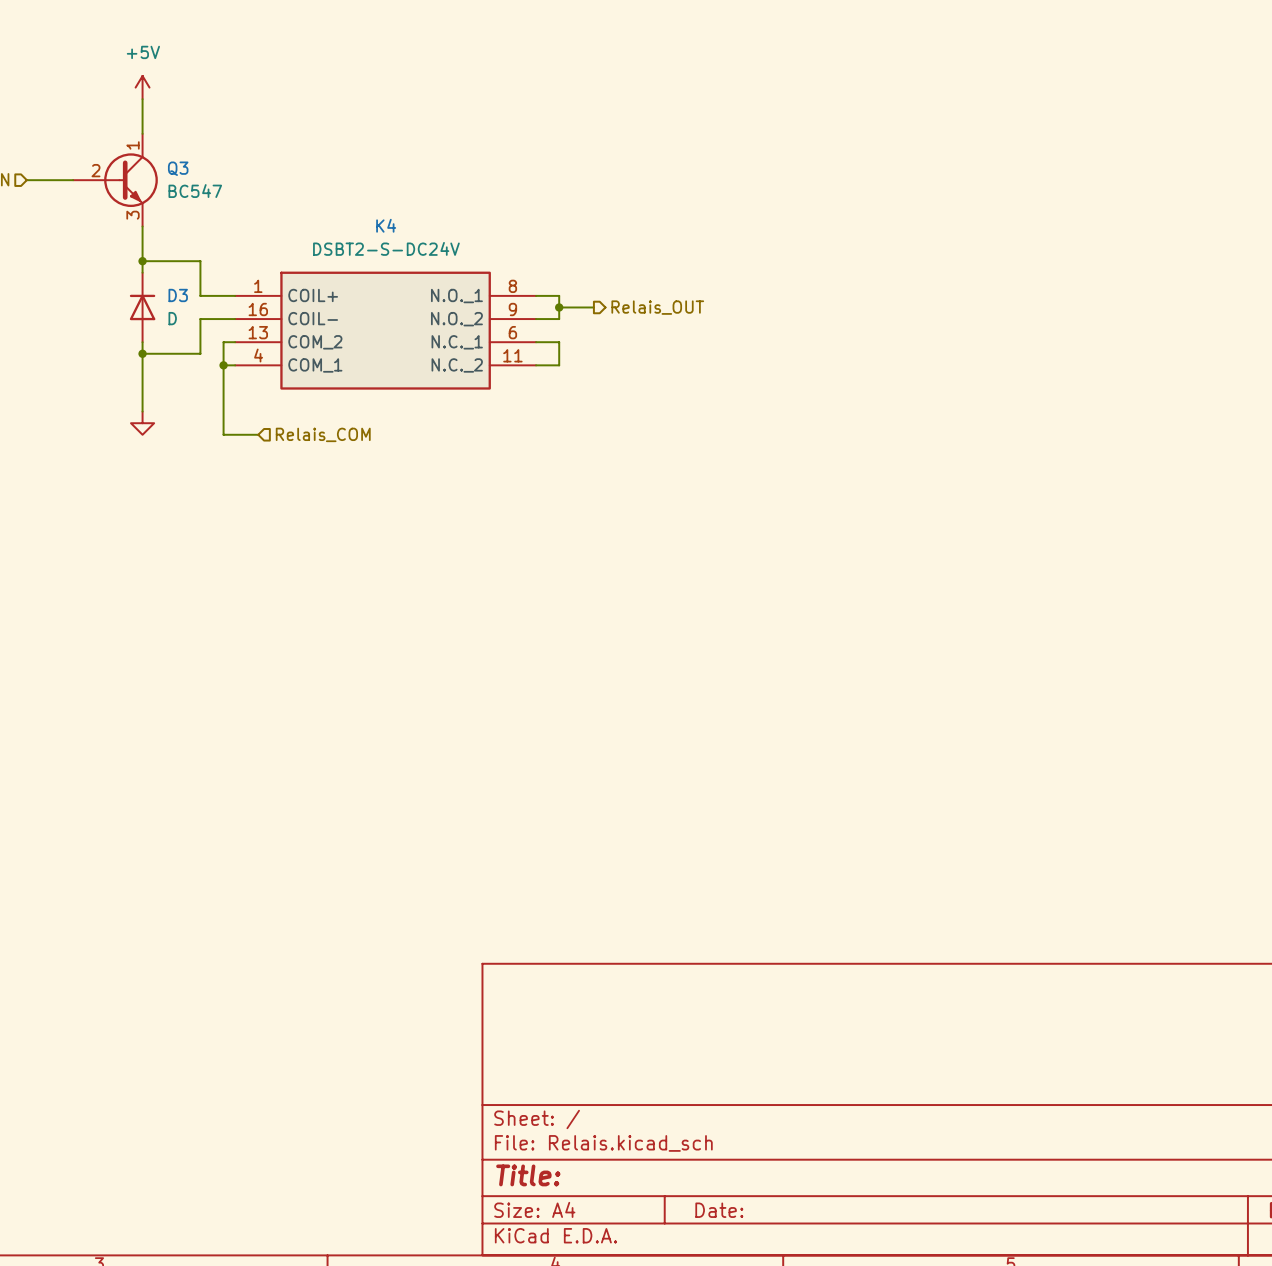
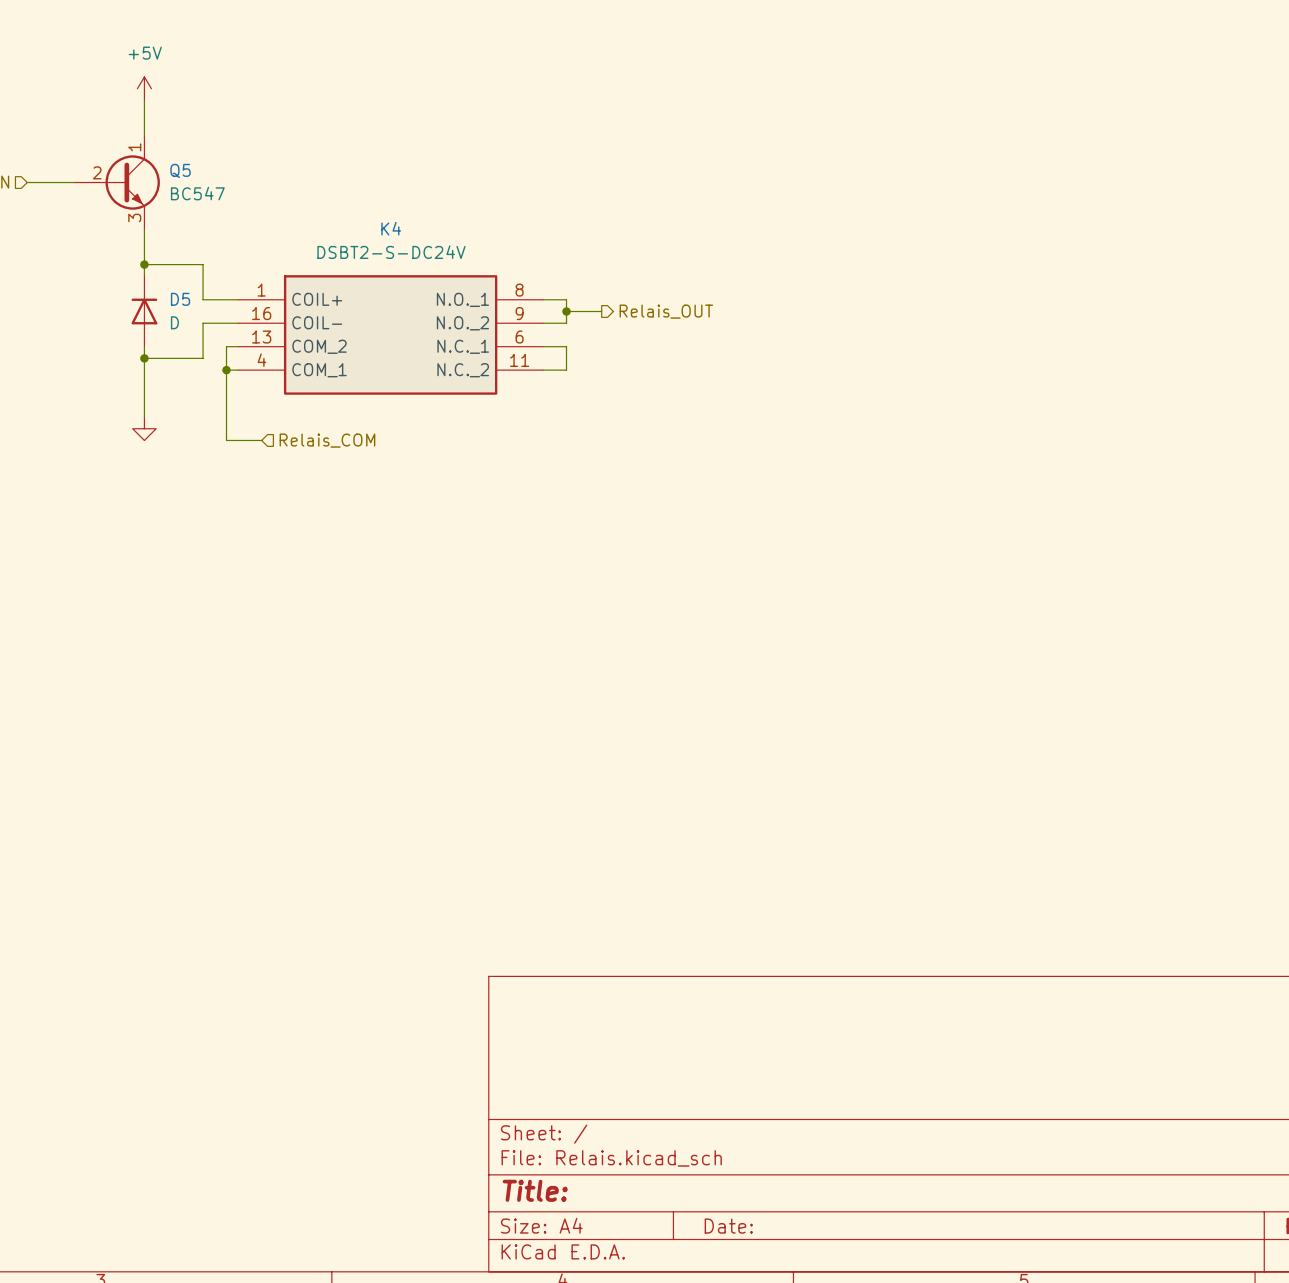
Q3 name: Q3 (178, 168) -> Q5 (180, 170)
D3 name: D3 (178, 295) -> D5 (180, 299)

